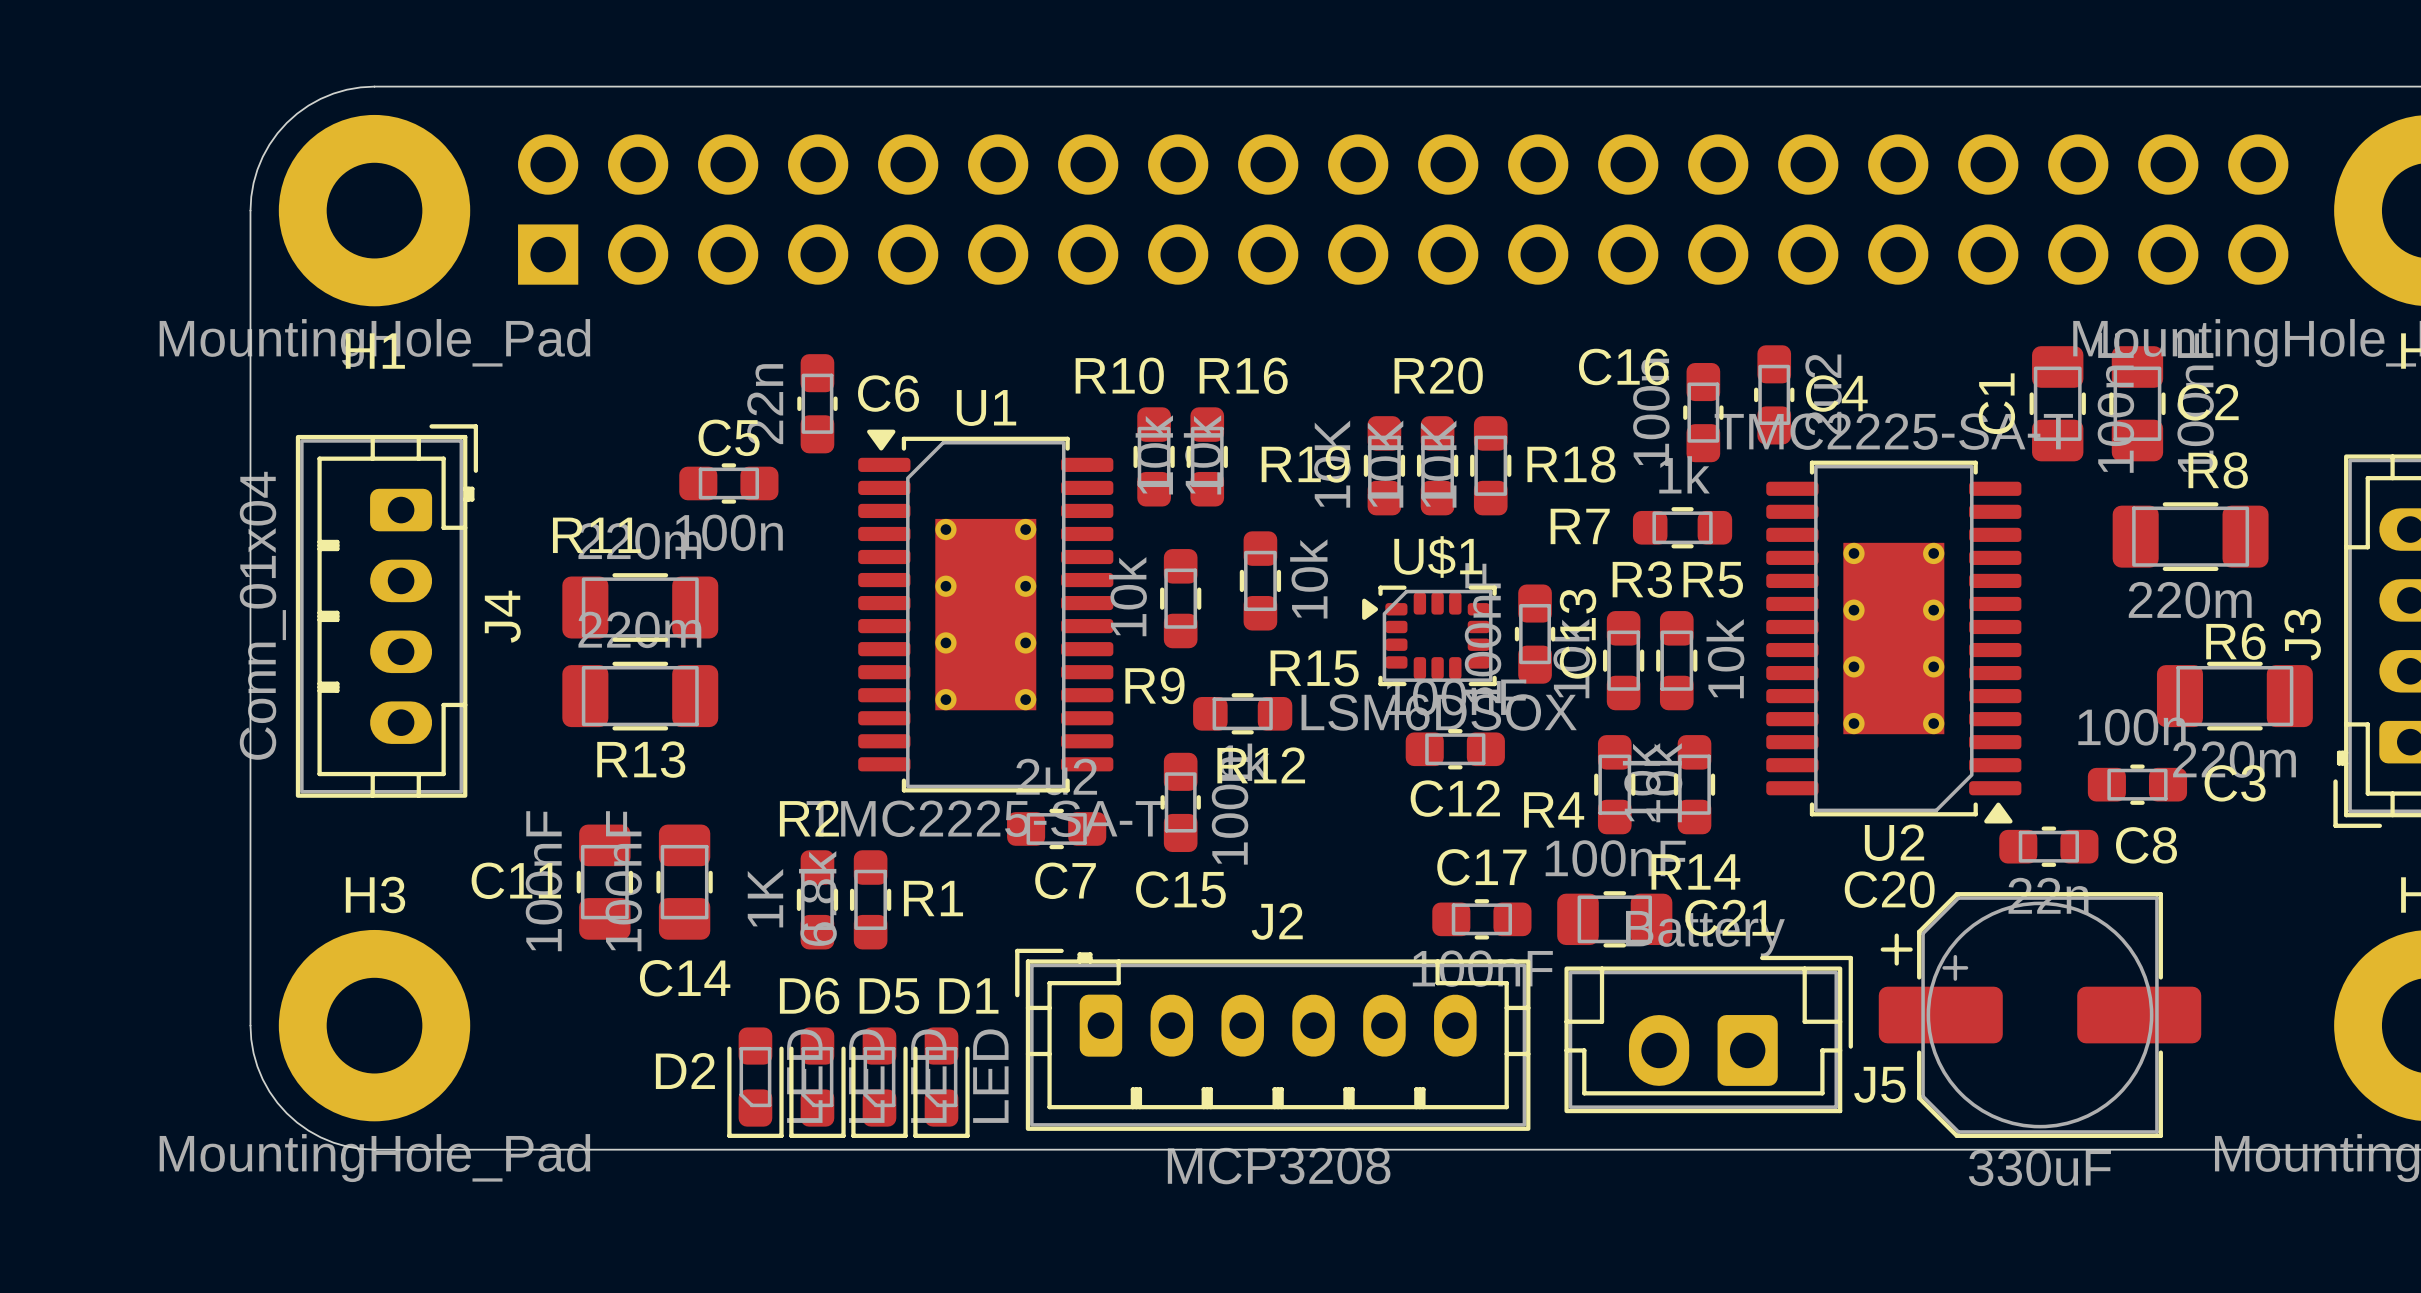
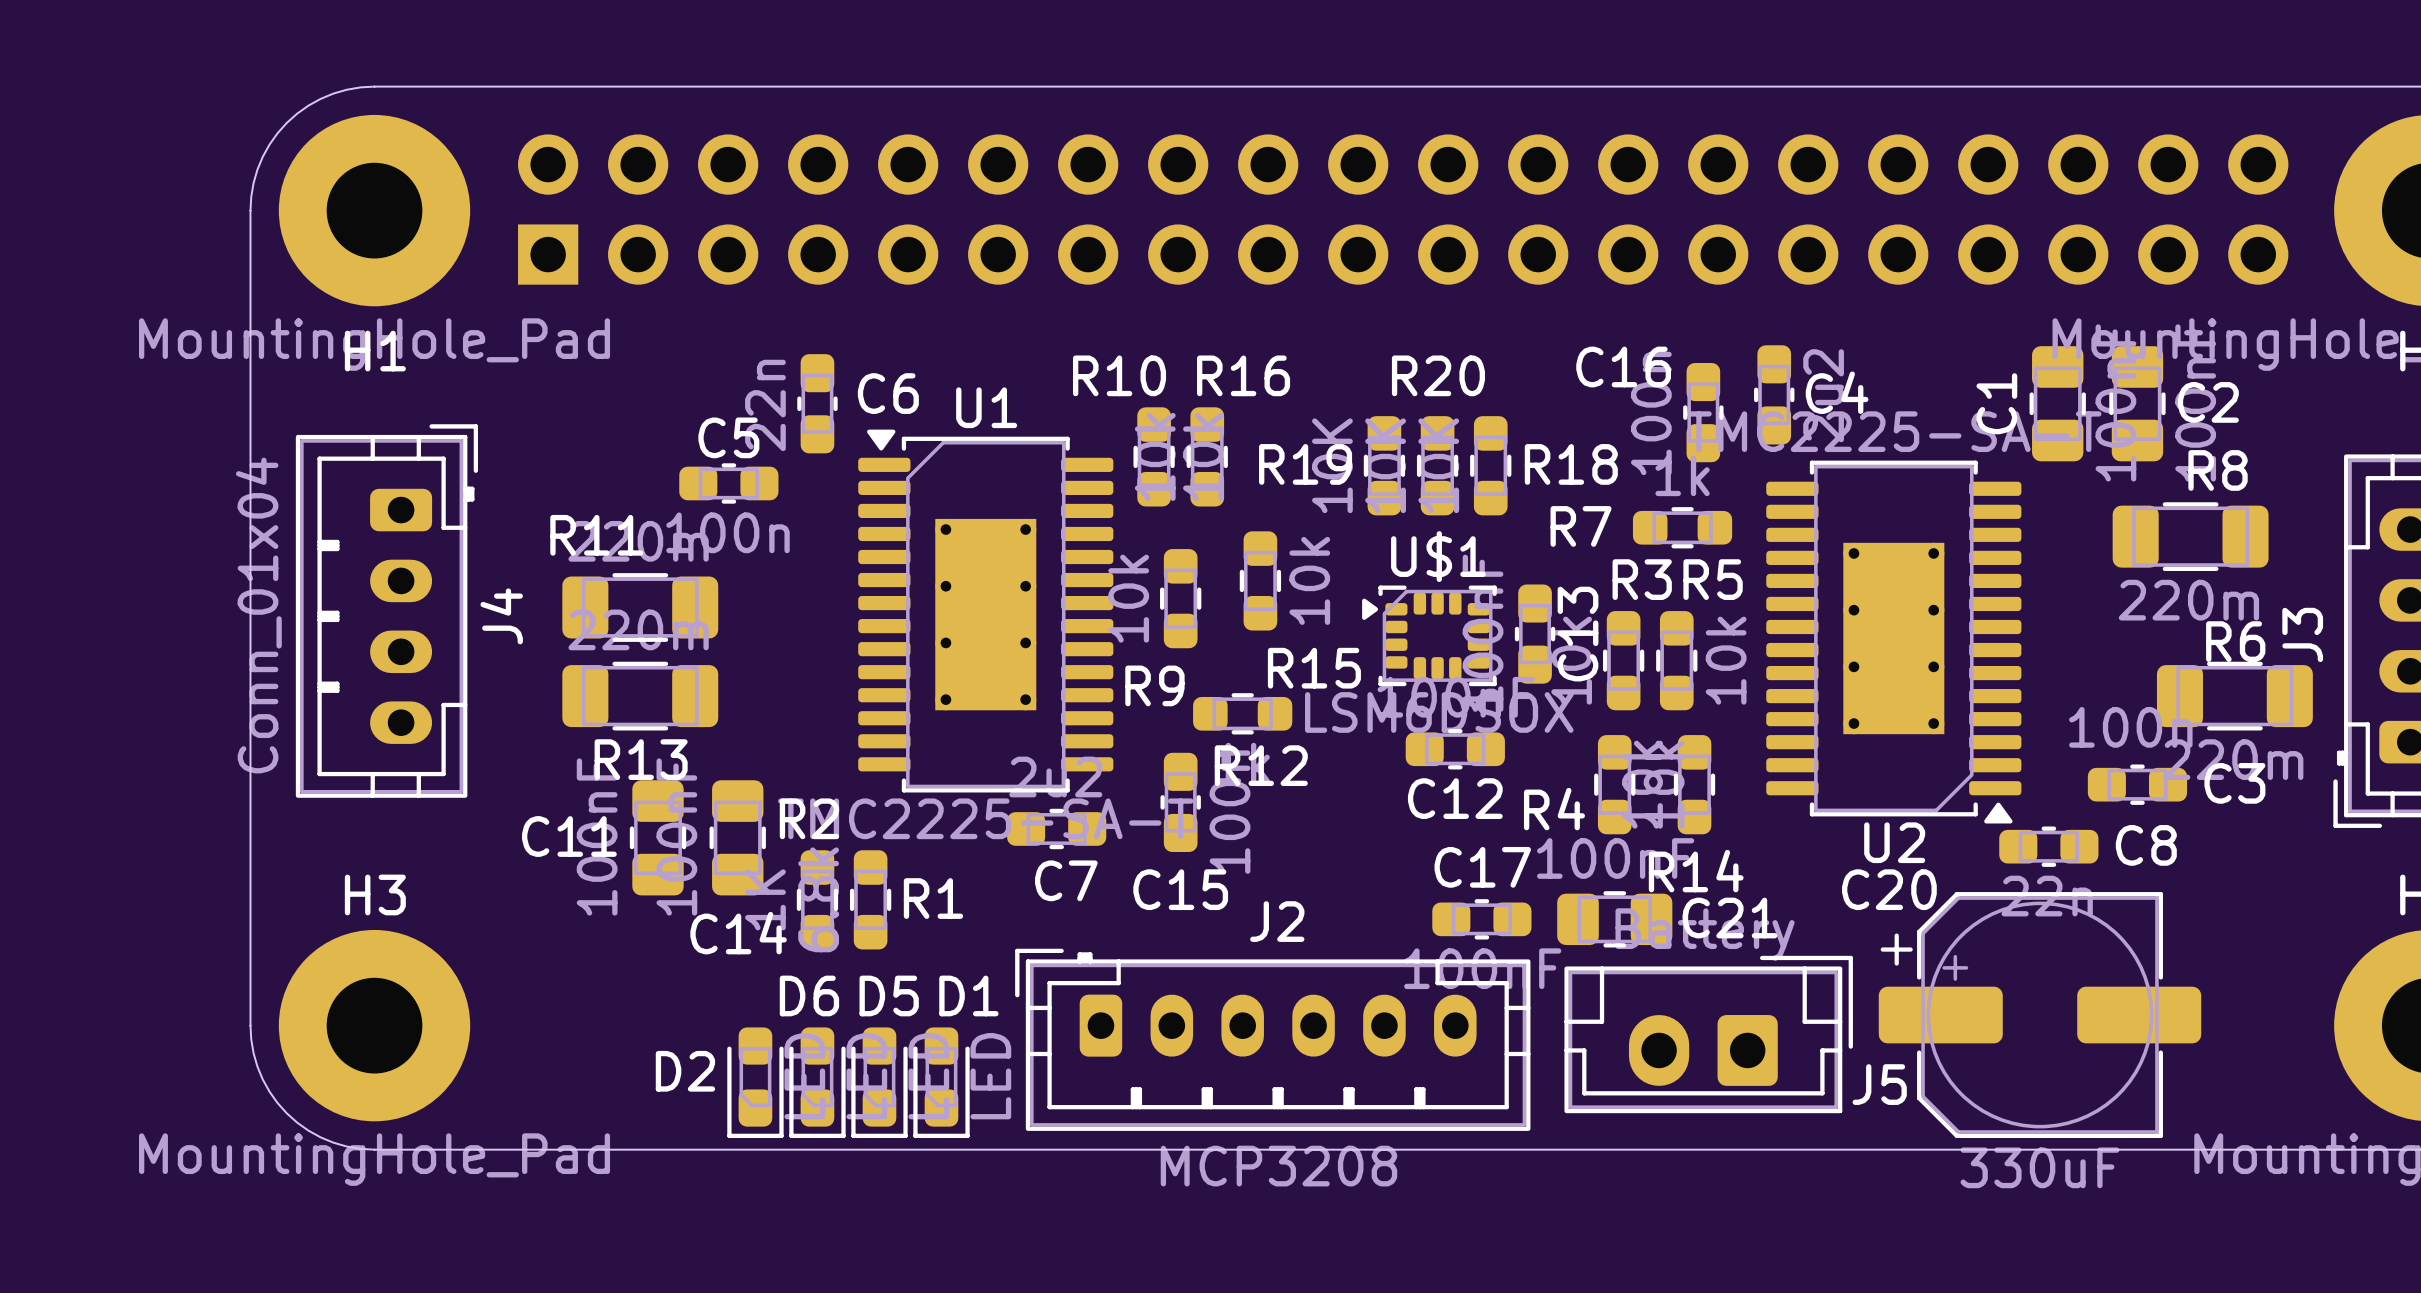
C11 position: (604, 882) -> (658, 837)
C14 position: (684, 882) -> (737, 837)

